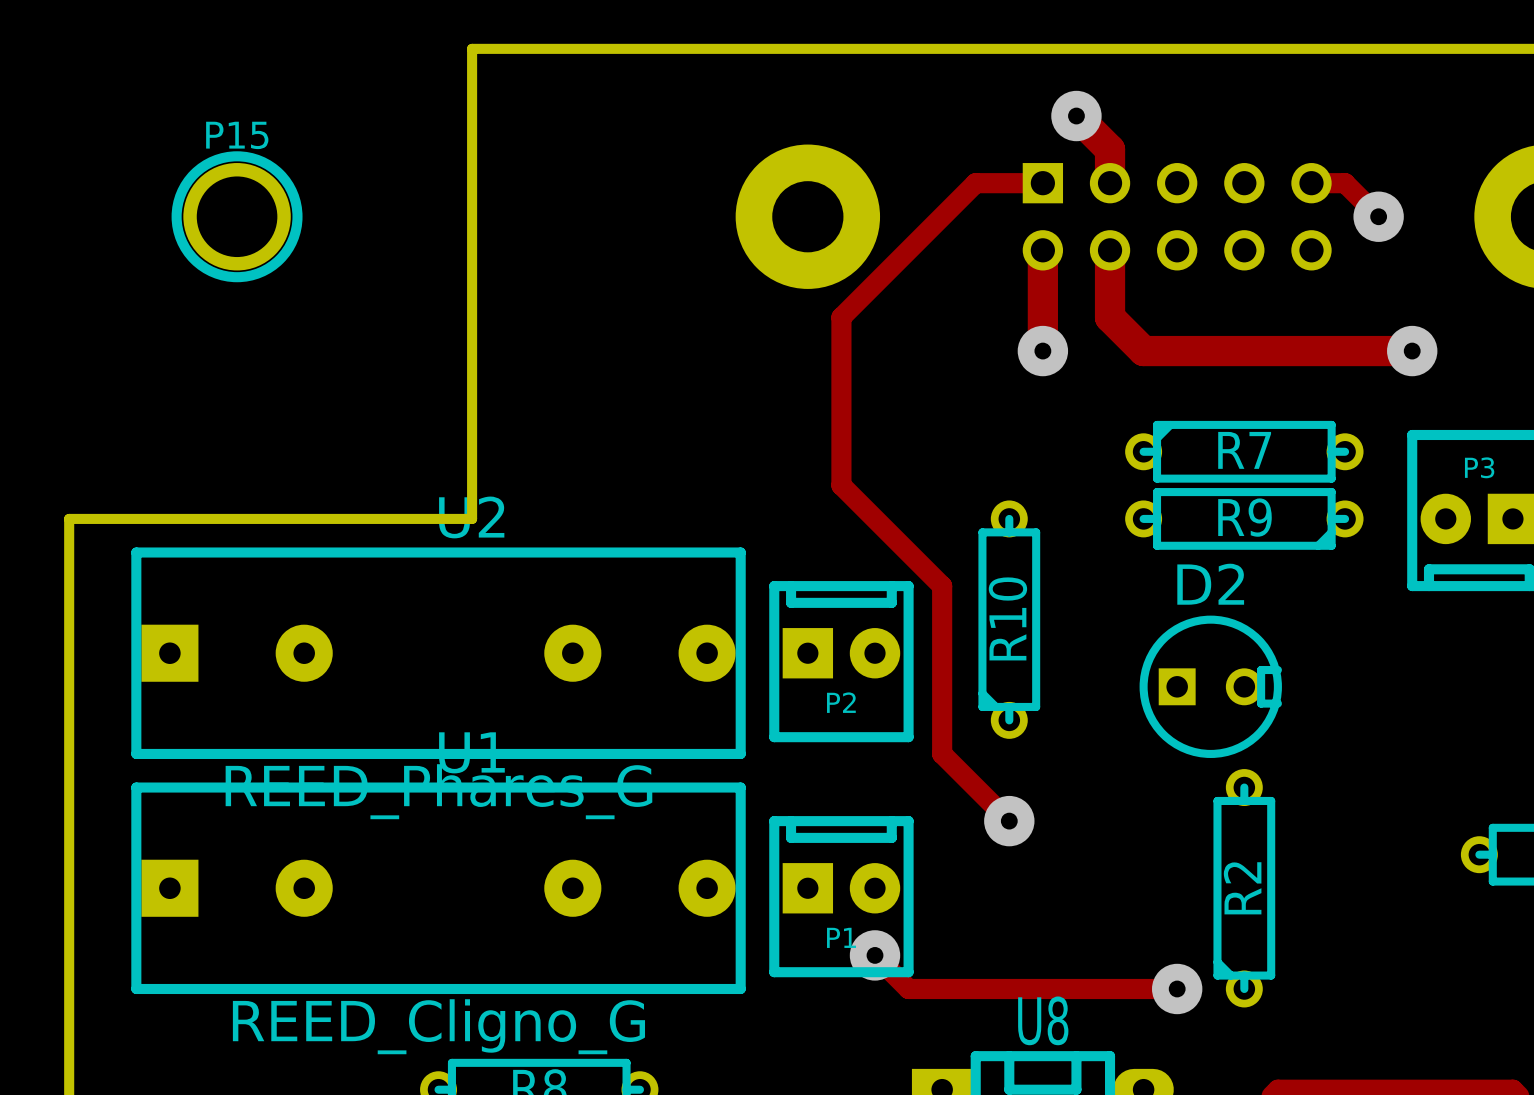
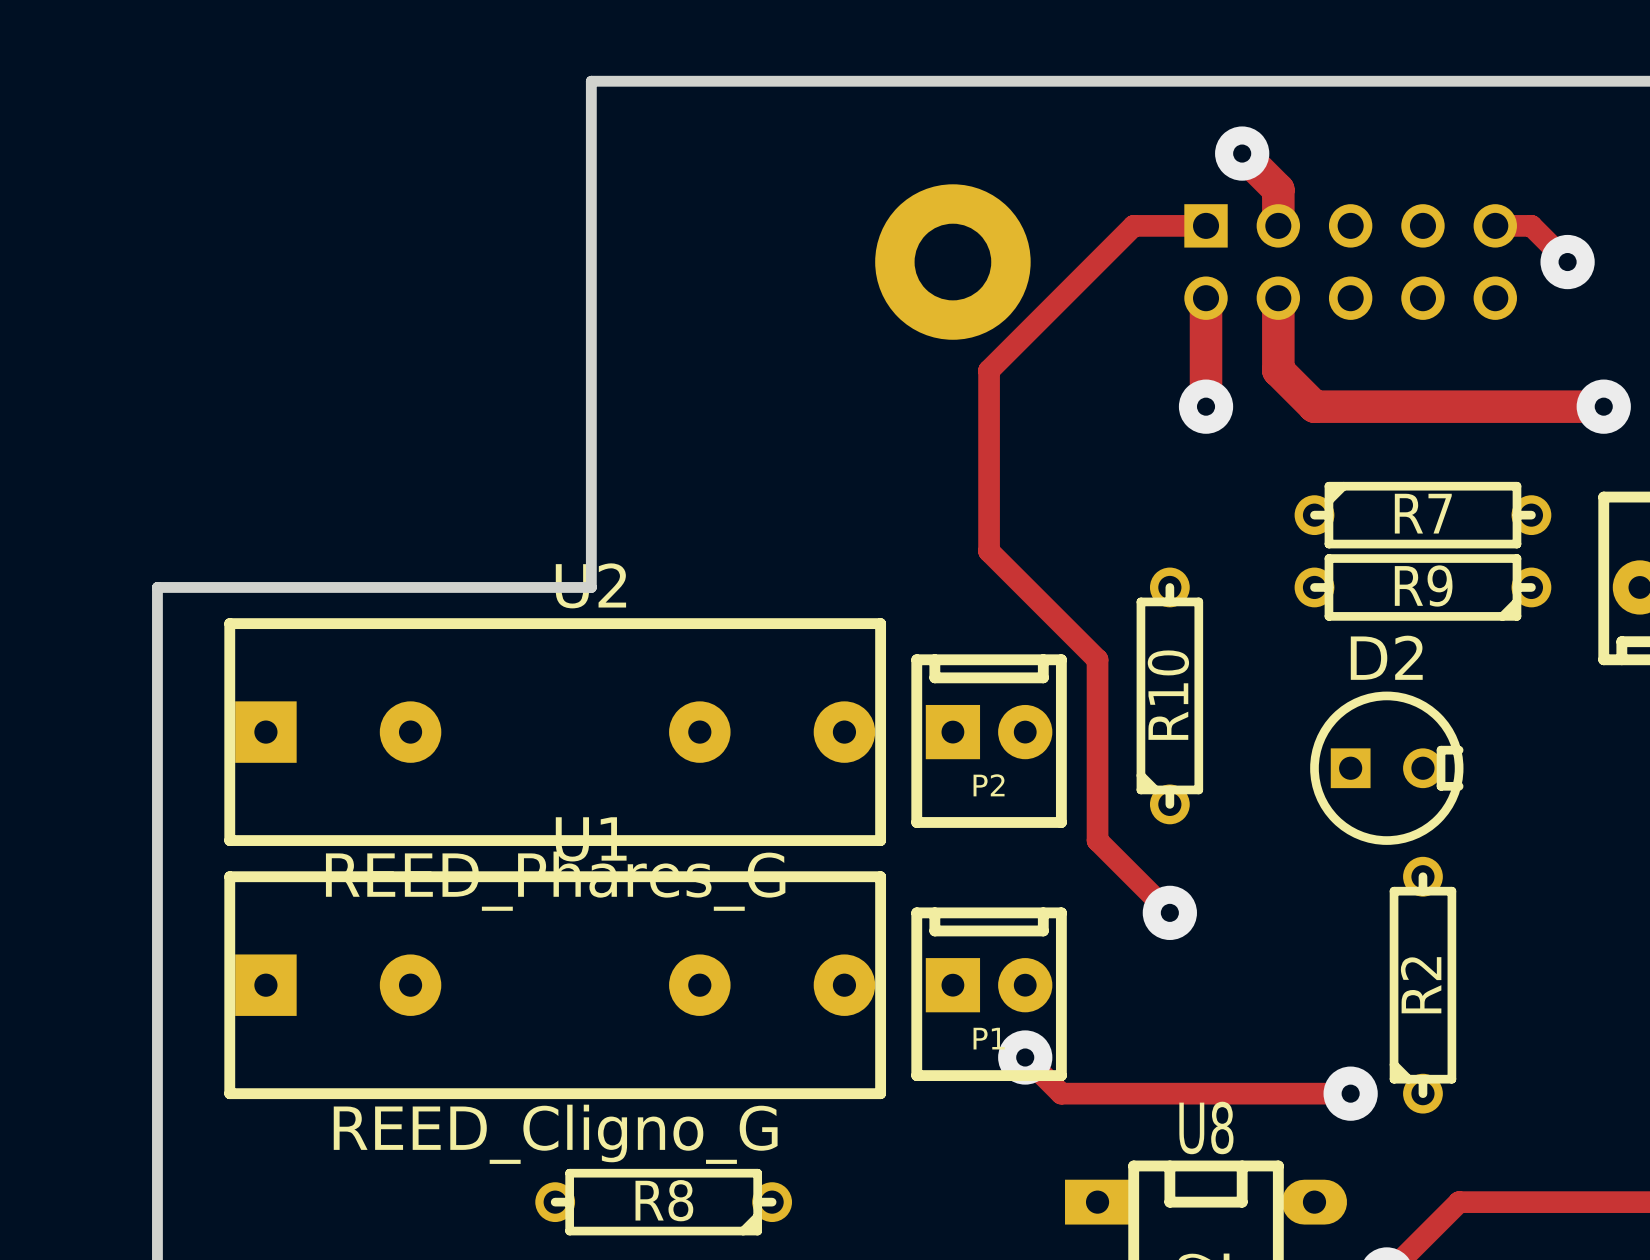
P15: (237, 216) -> none

